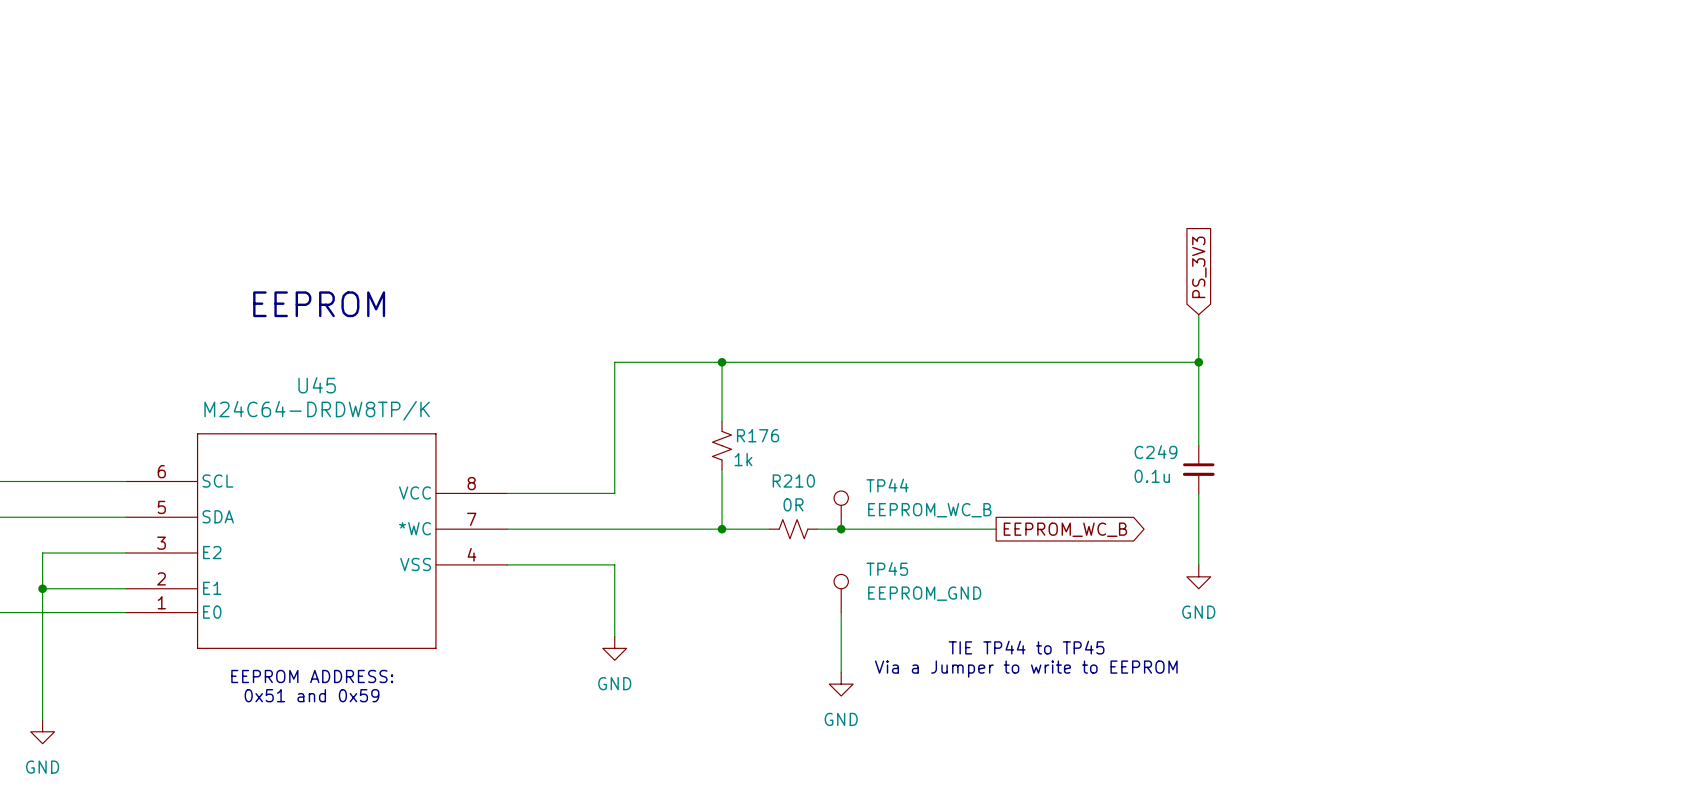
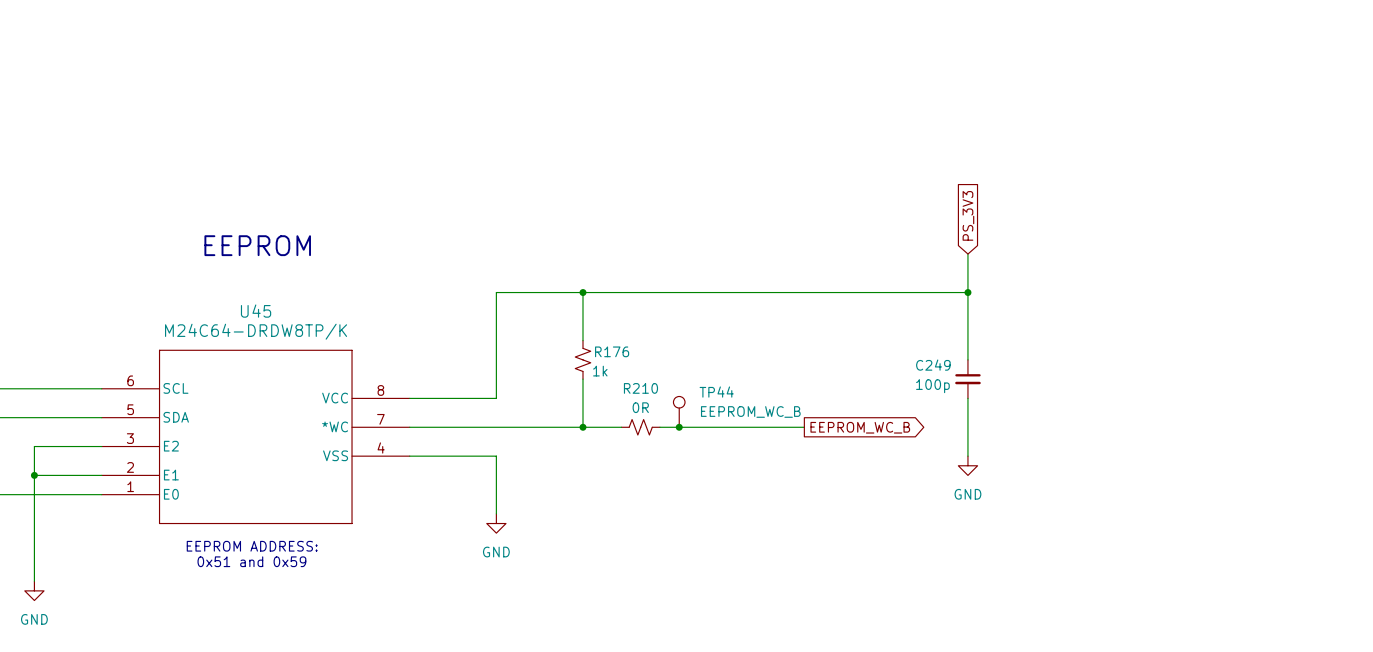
C249 value: 0.1u (1152, 476) -> 100p (932, 386)
TP45: EEPROM_GND (841, 593) -> none
wire: (841, 612) (841, 672) -> none
text: TIE TP44 to TP45 (1026, 647) -> none
text: Via a Jumper to write to EEPROM (1026, 669) -> none
power symbol: GND (841, 684) -> none

